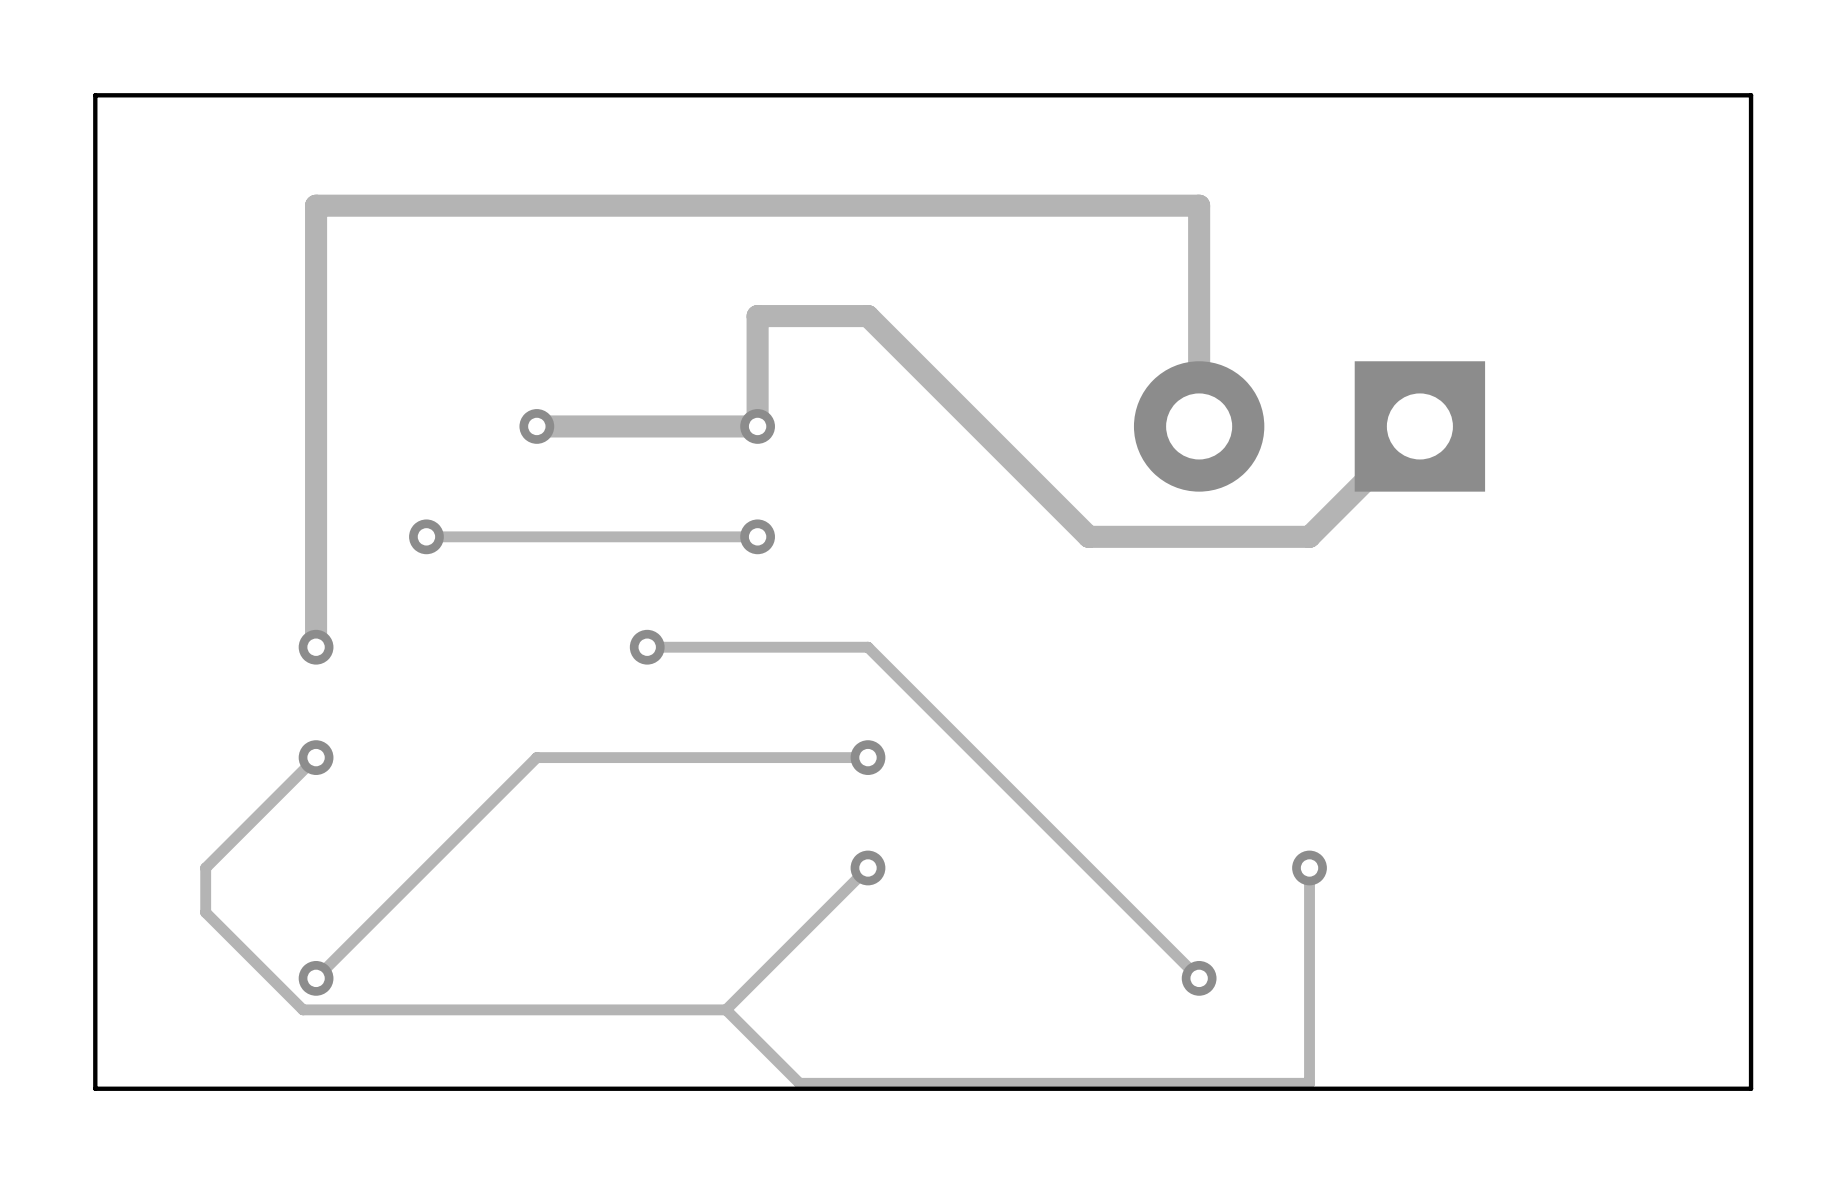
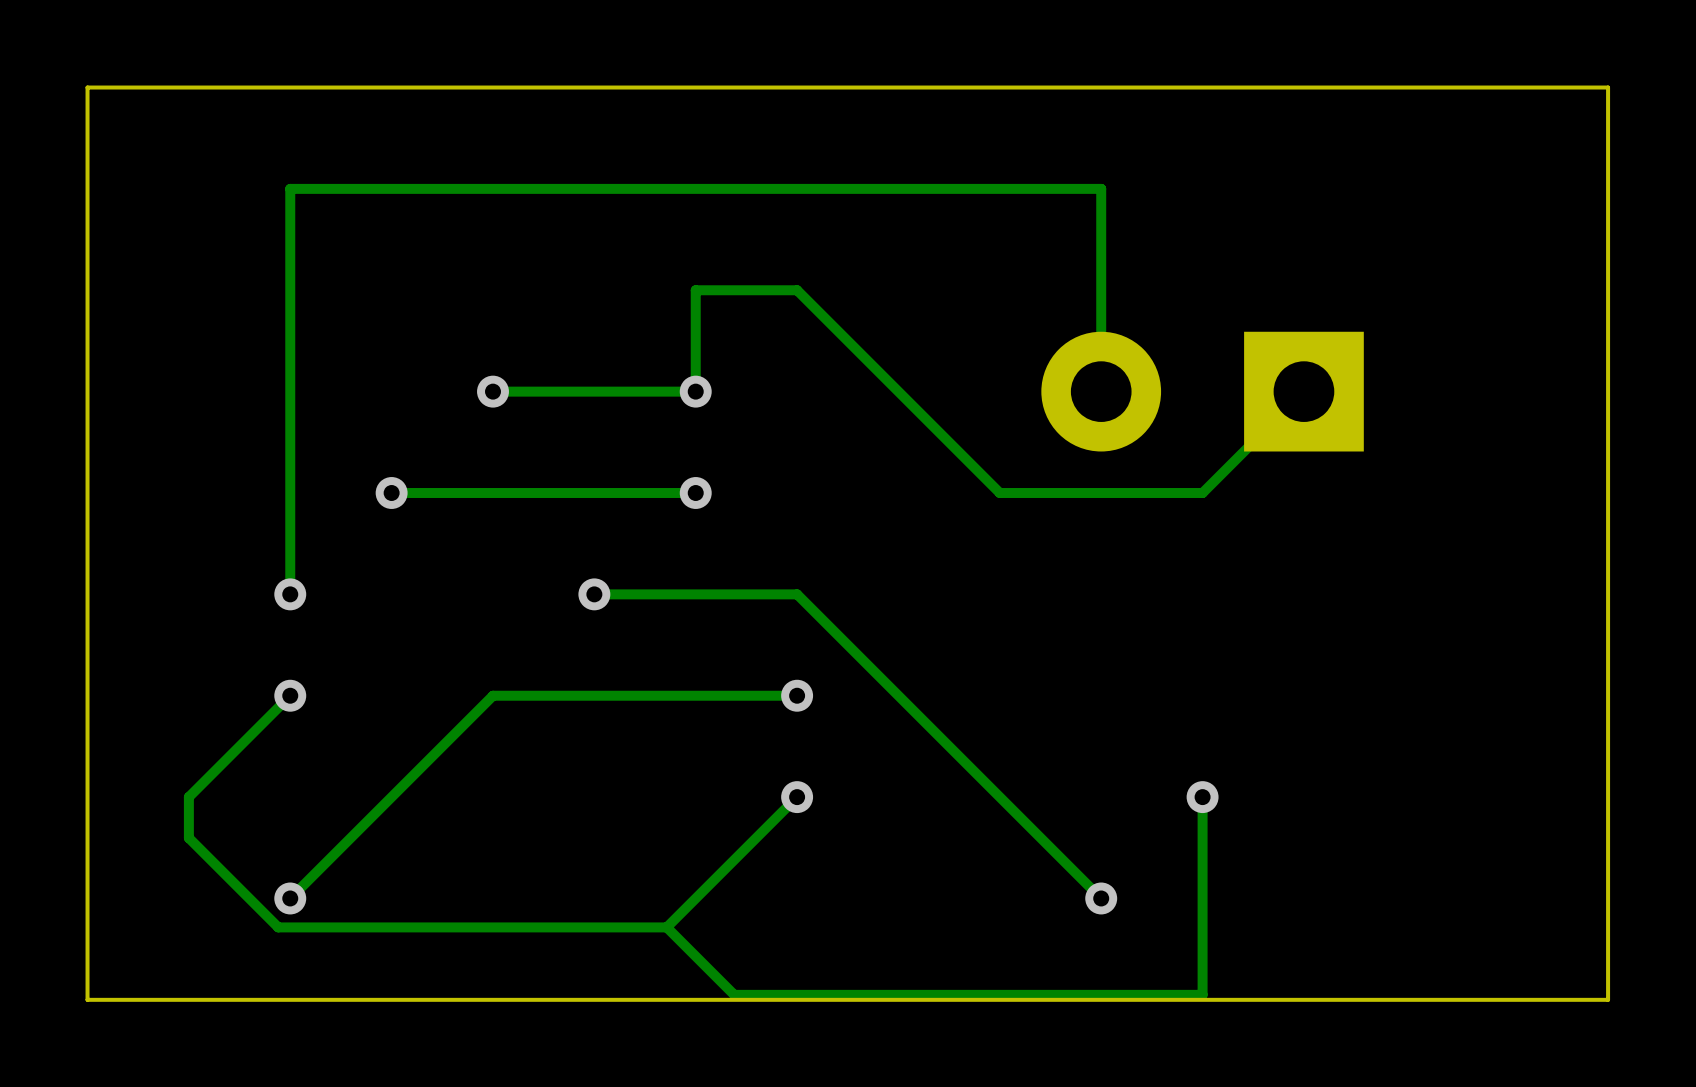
track width: thick (1199, 426) (1199, 205) (316, 205) (316, 647) -> thin (1101, 391) (1101, 188) (290, 188) (290, 594)
track width: thick (1419, 426) (1309, 536) (1088, 536) (867, 316) (757, 316) (757, 426) (536, 426) -> thin (1303, 391) (1202, 493) (999, 493) (797, 290) (695, 290) (695, 391) (493, 391)

